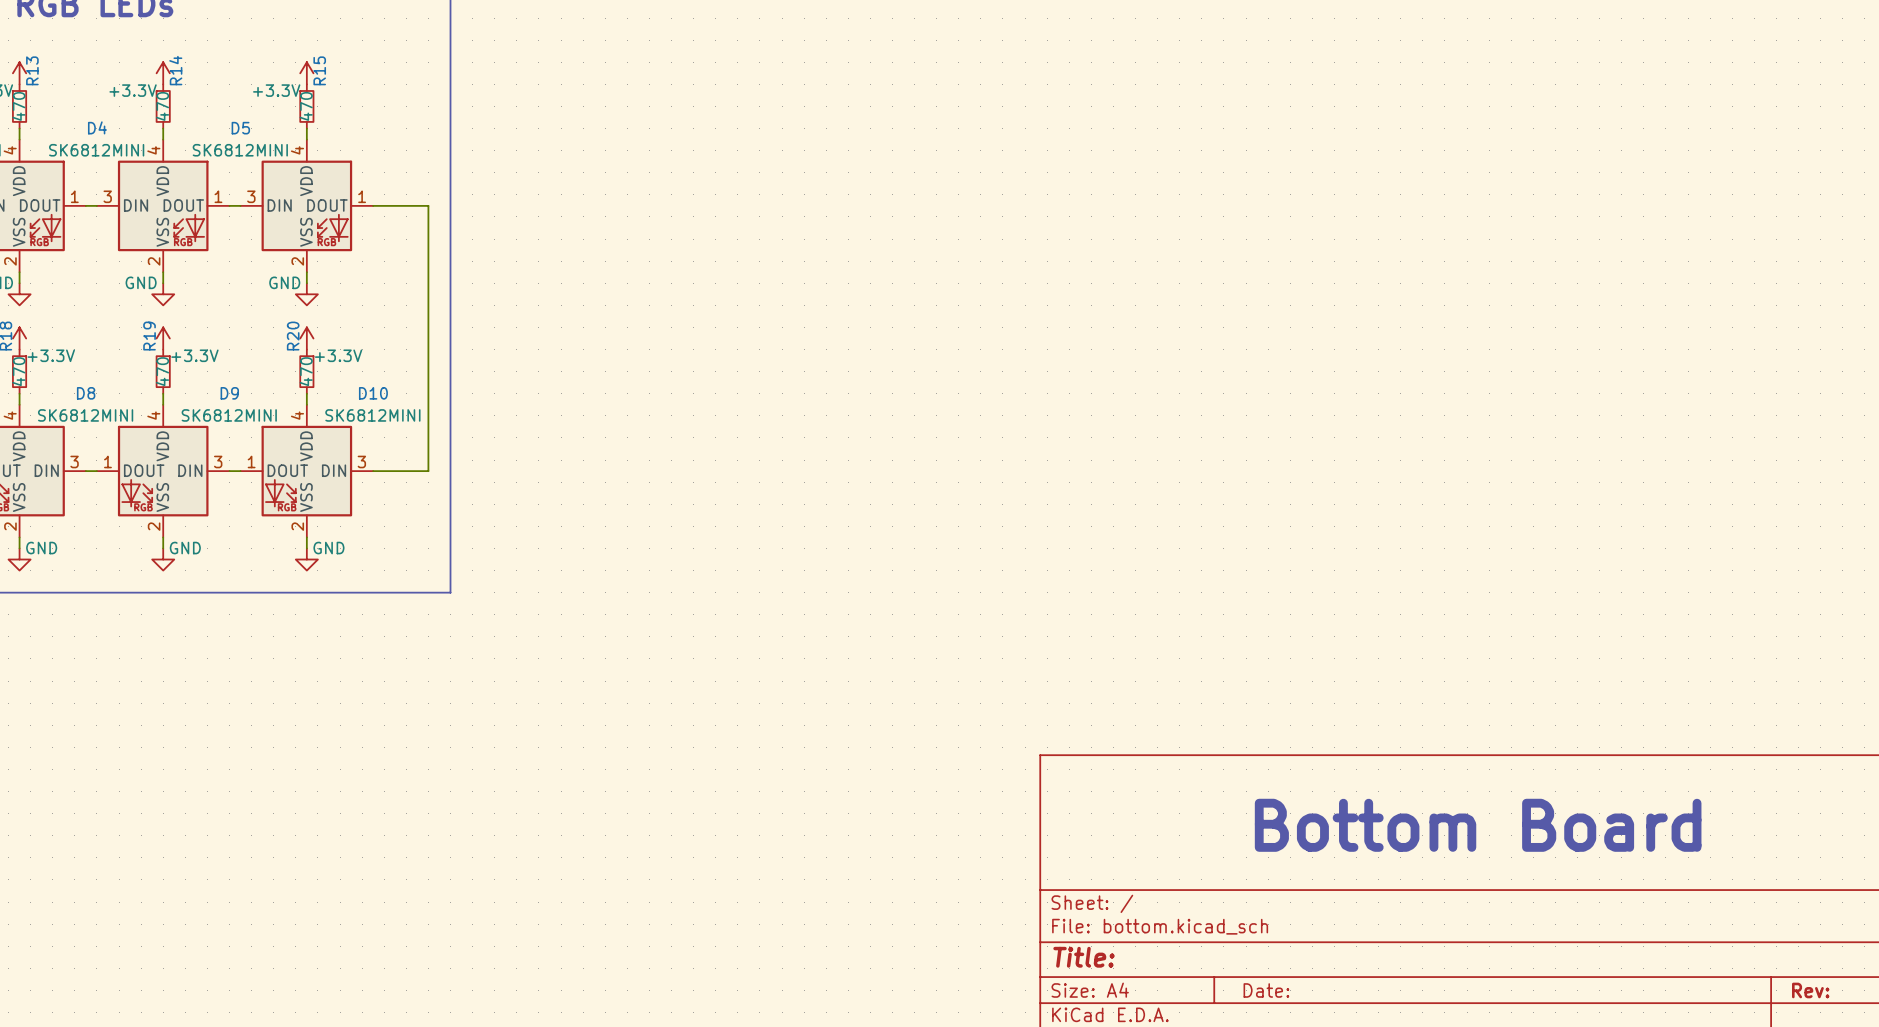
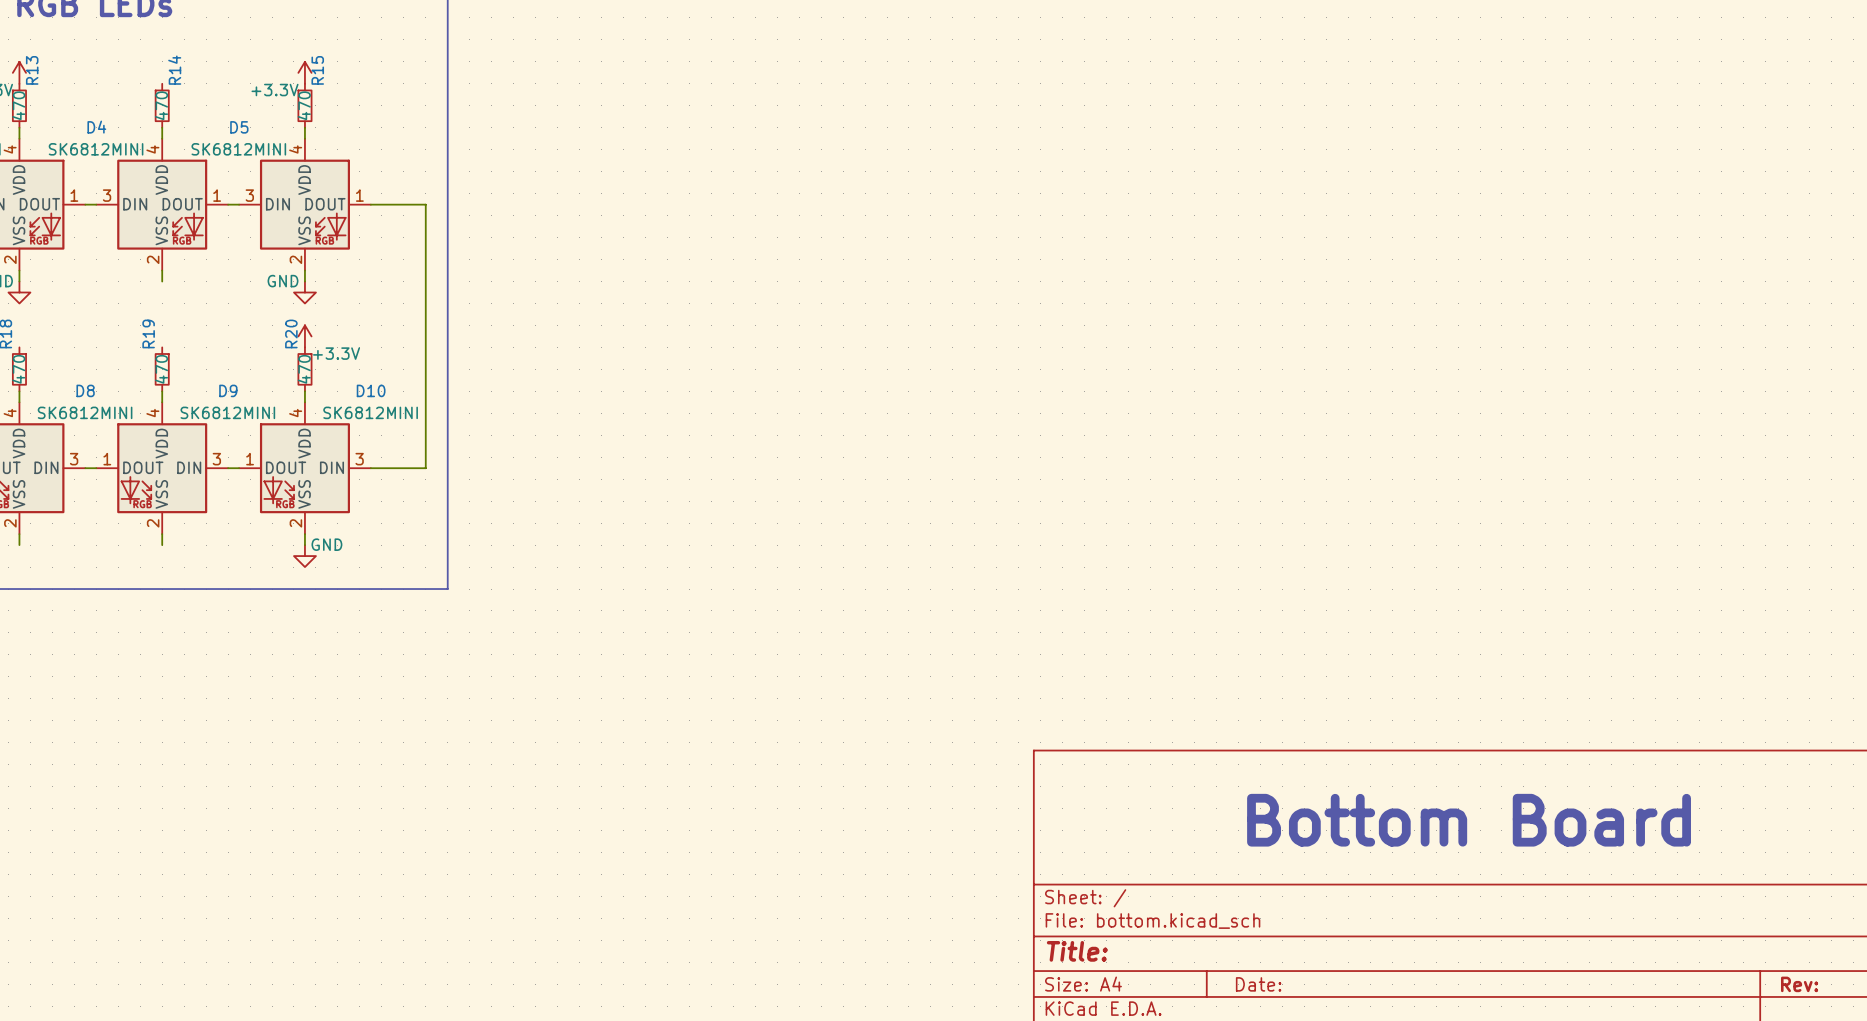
power symbol: +3.3V (163, 73) -> none
power symbol: GND (163, 294) -> none
power symbol: +3.3V (19, 338) -> none
power symbol: +3.3V (163, 338) -> none
power symbol: GND (19, 559) -> none
power symbol: GND (163, 559) -> none

